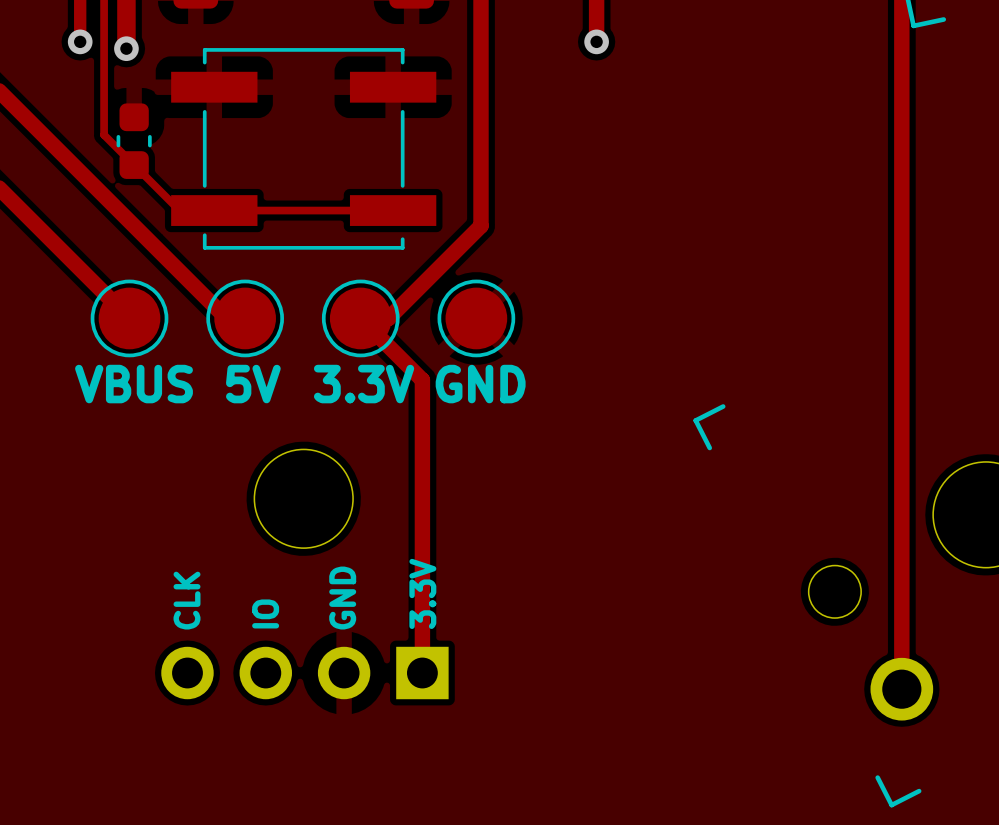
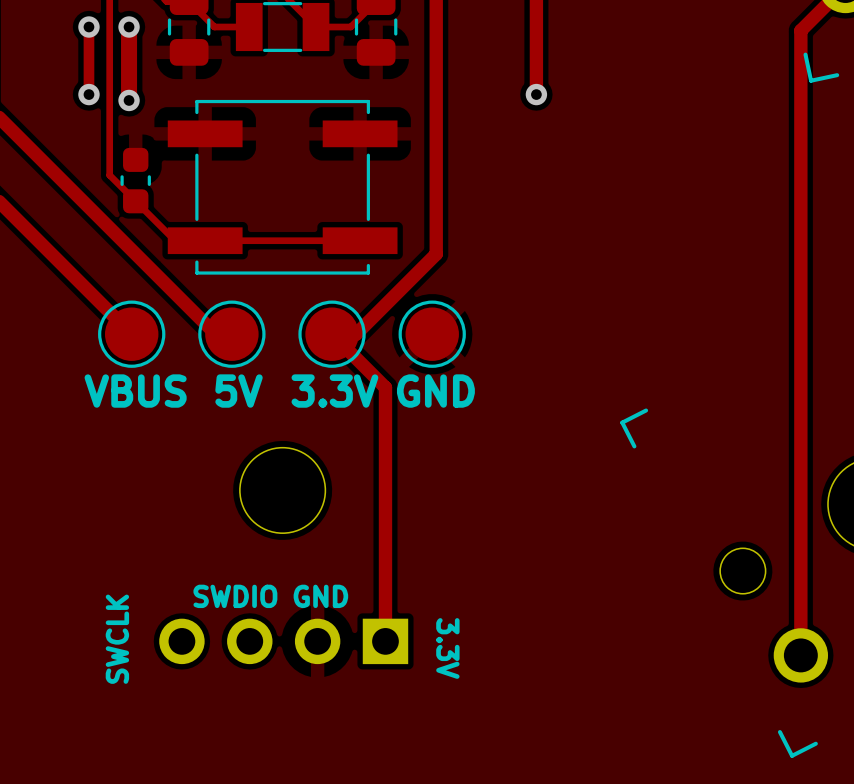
text rotation: 0° (422, 593) -> 180° (447, 648)
text position: 3.3V (422, 593) -> 3.3V (447, 648)
text rotation: 0° (342, 598) -> 90° clockwise (320, 596)
text: CLK (187, 600) -> SWDIO (235, 596)
text: IO (265, 613) -> none
text: none -> SWCLK (117, 639)

